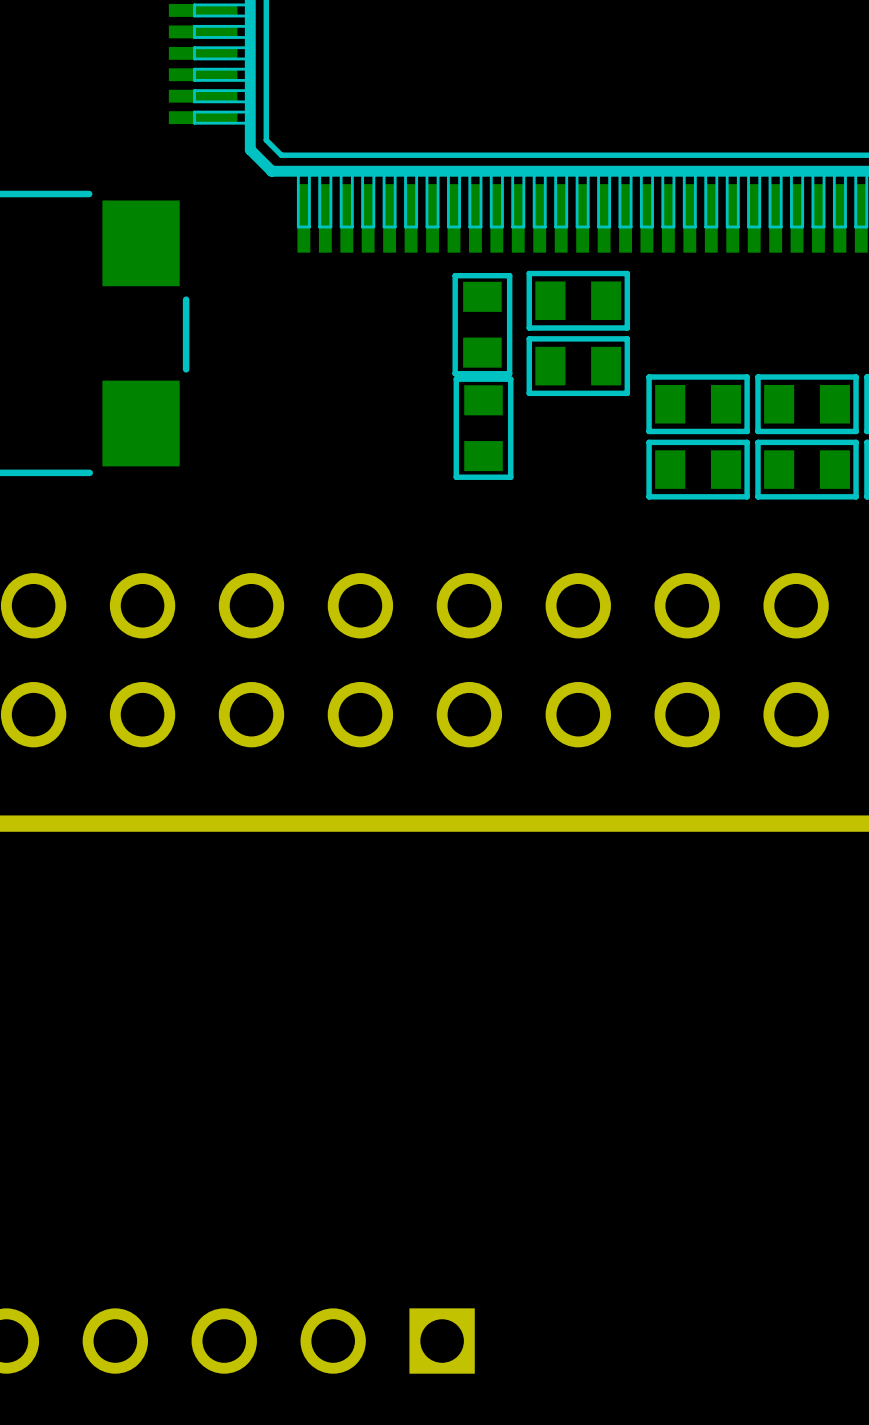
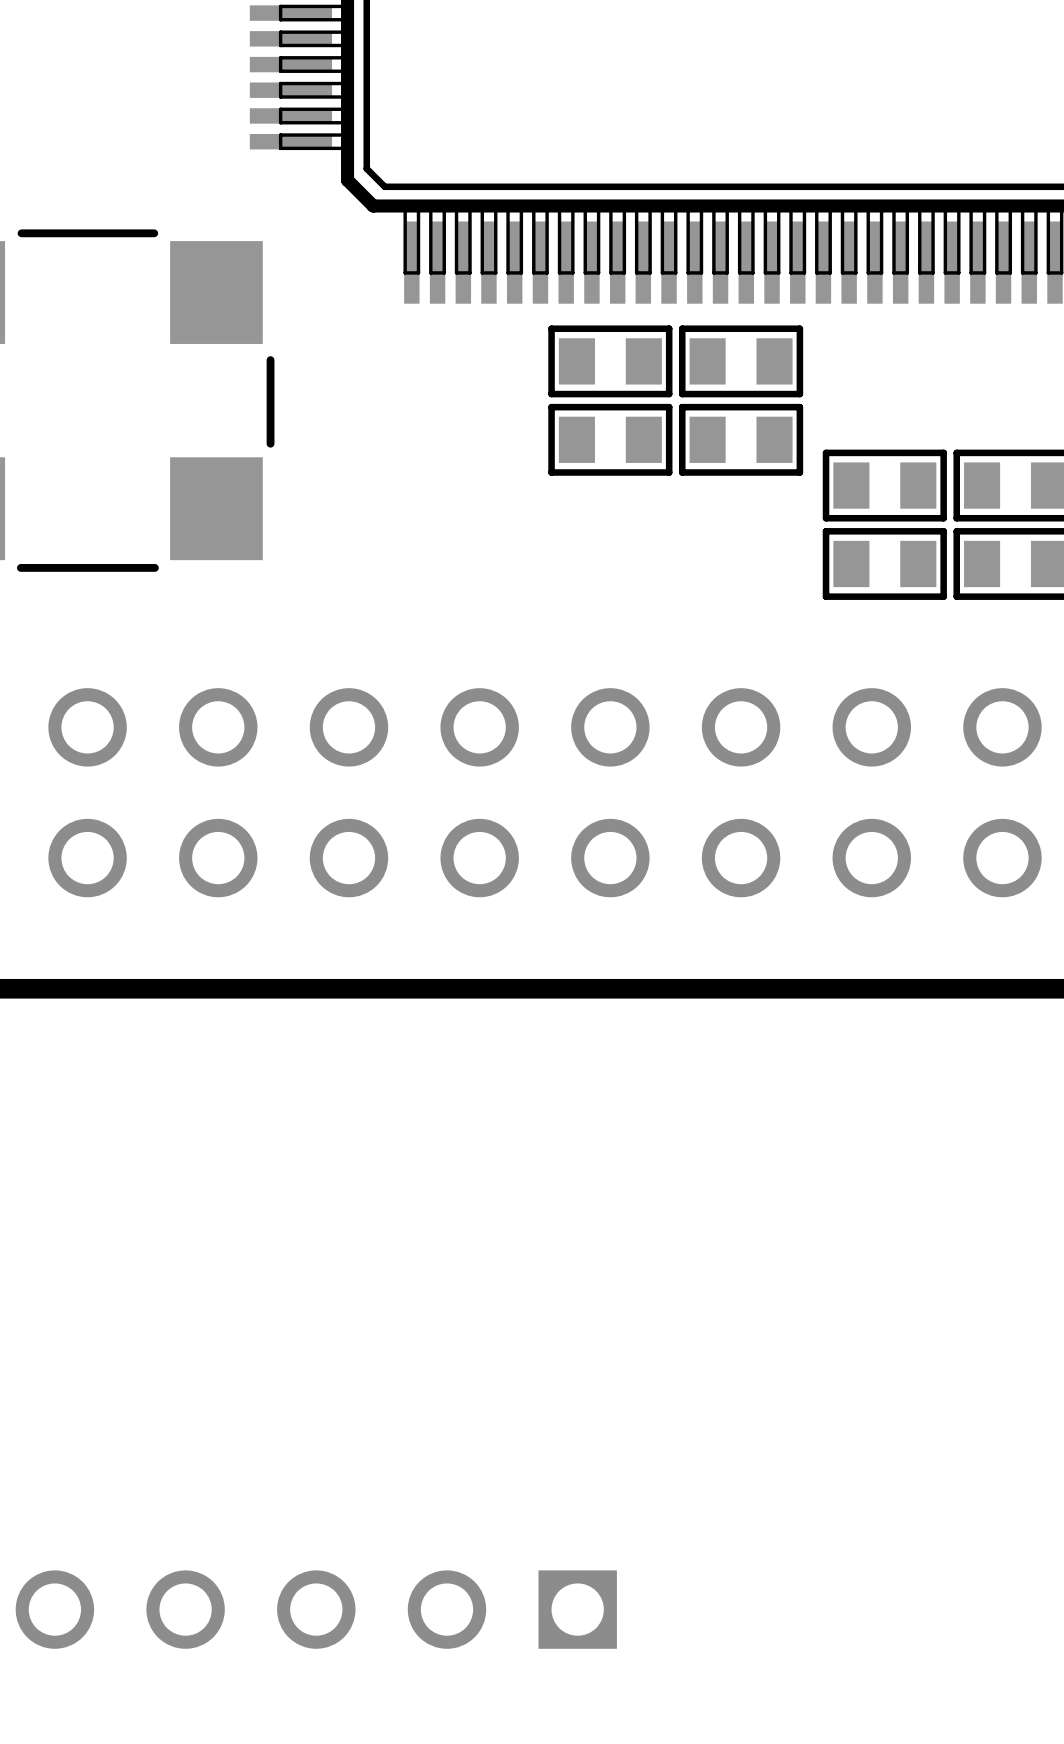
part: none -> (610, 361)
part: (482, 324) -> none
part: none -> (610, 439)
part: (483, 428) -> none

